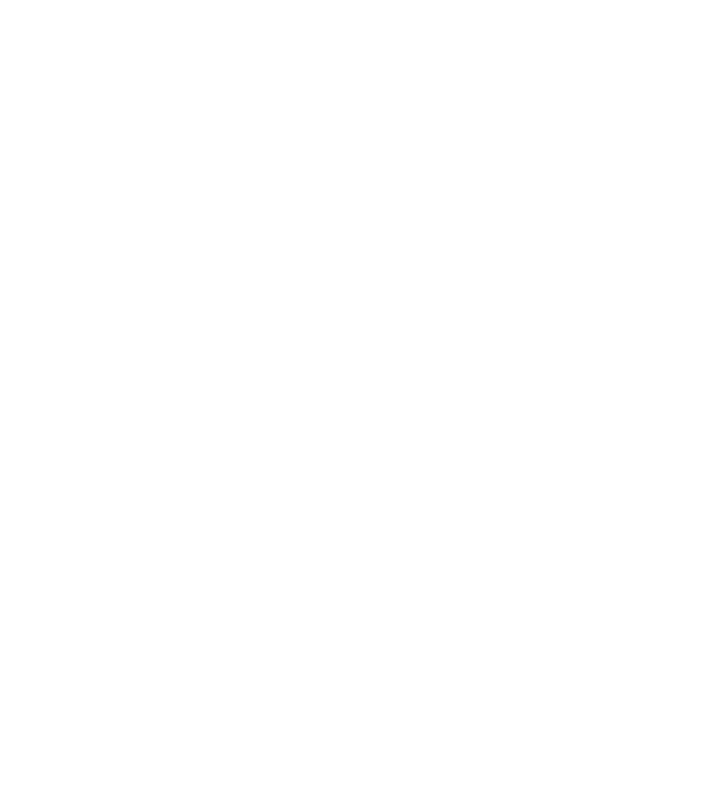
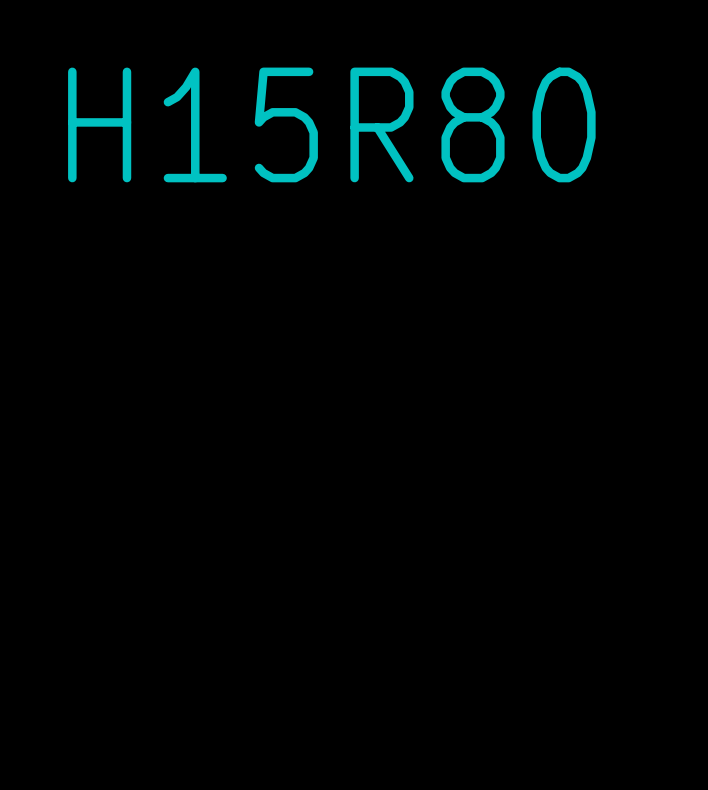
text: none -> H15R80 (331, 124)

